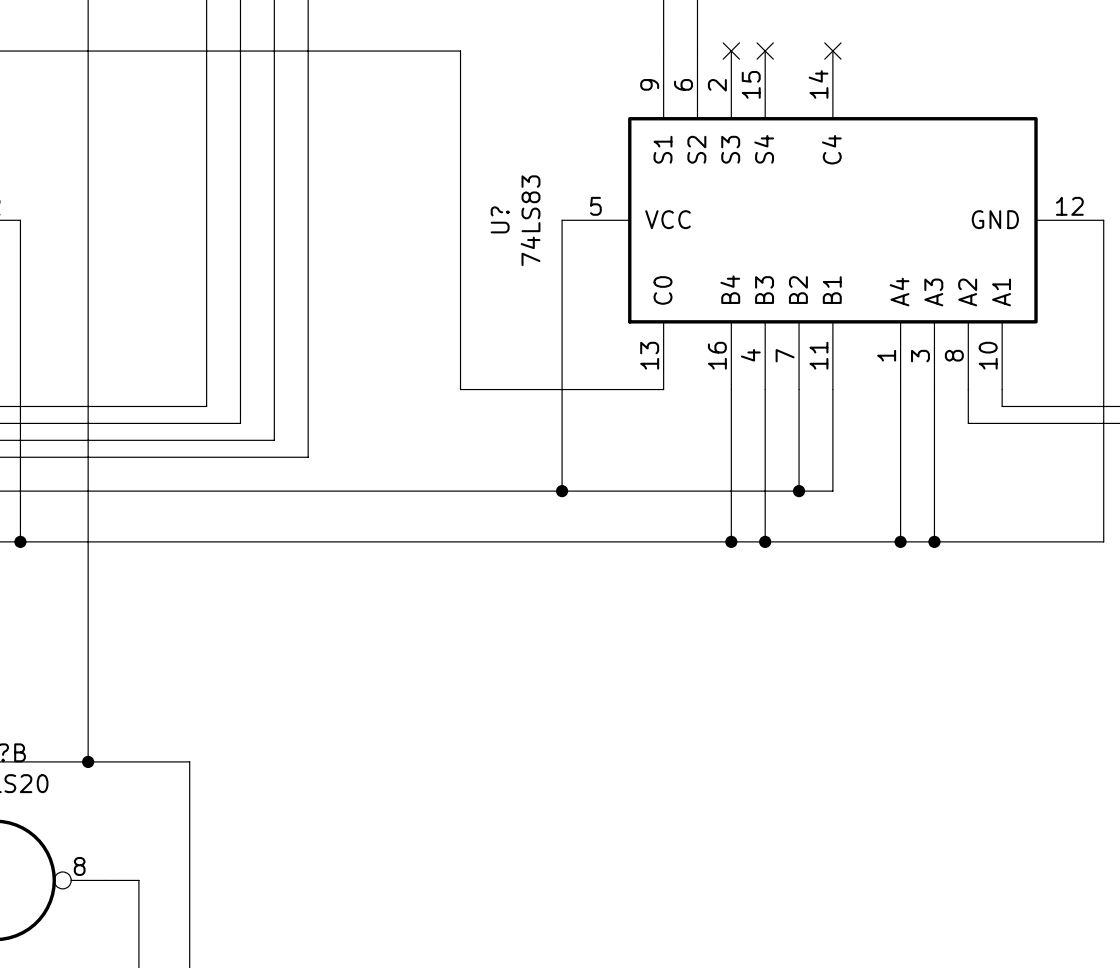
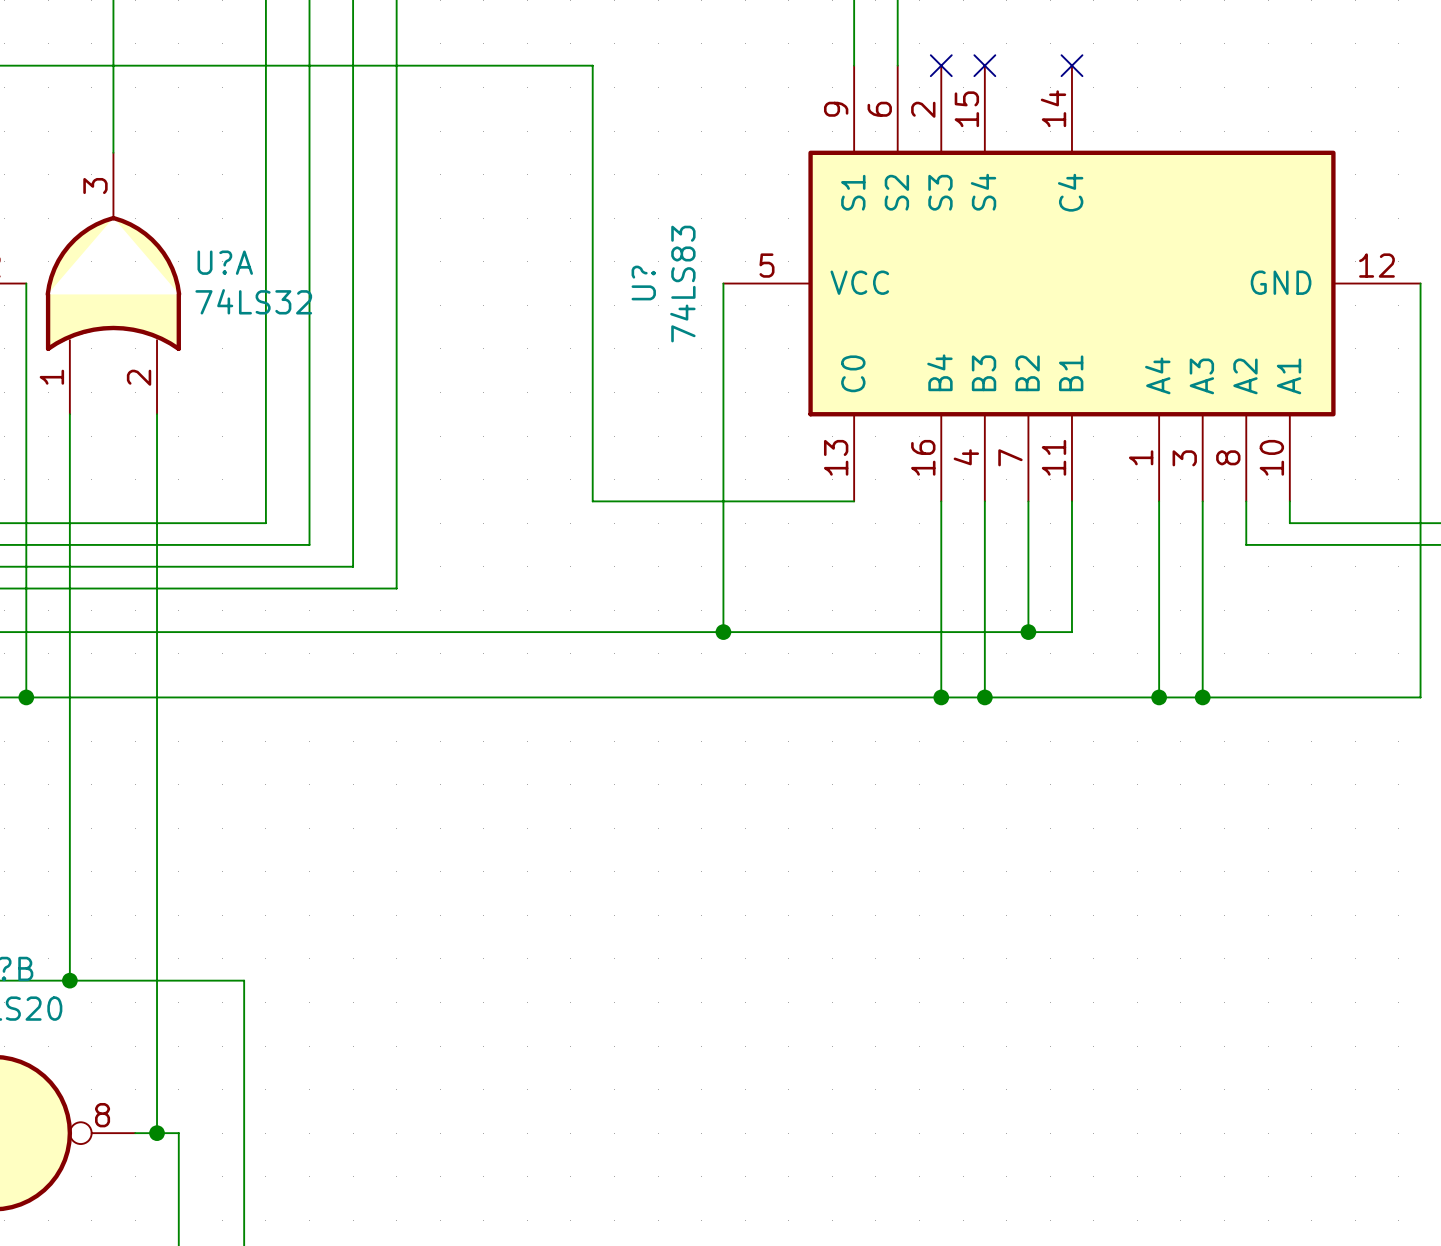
wire: (88, 118) (88, 761) -> none
U?A: none -> 74LS32 (113, 283)
wire: none -> (69, 414) (69, 980)
wire: none -> (157, 414) (157, 1133)
junction position: (88, 761) -> (69, 980)
junction: none -> (157, 1133)

